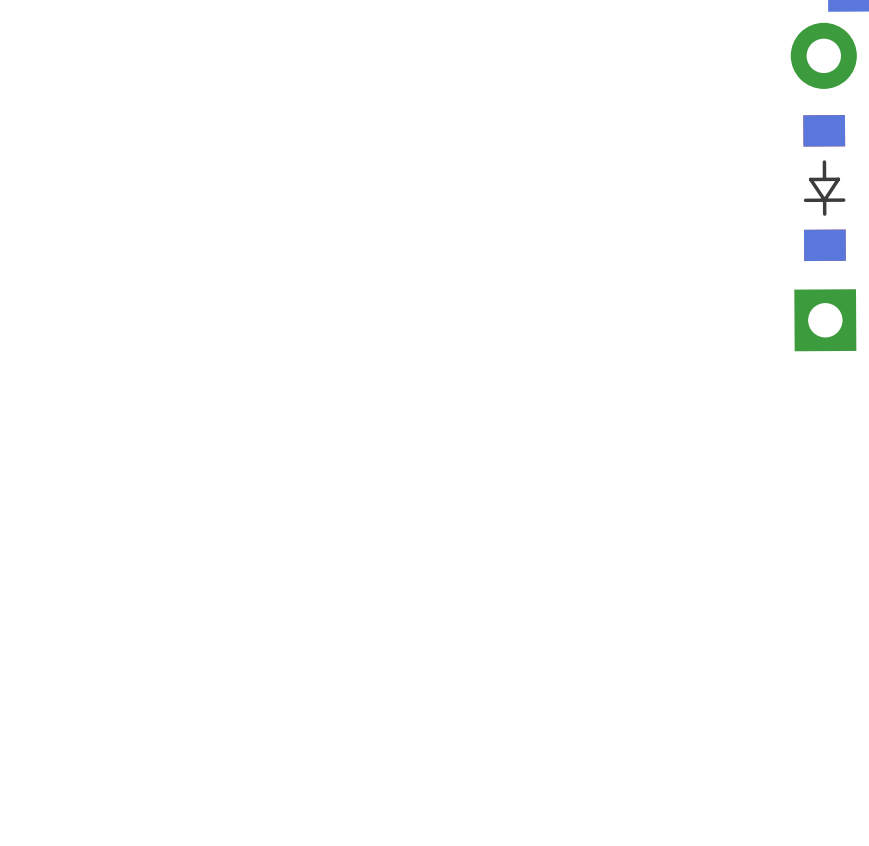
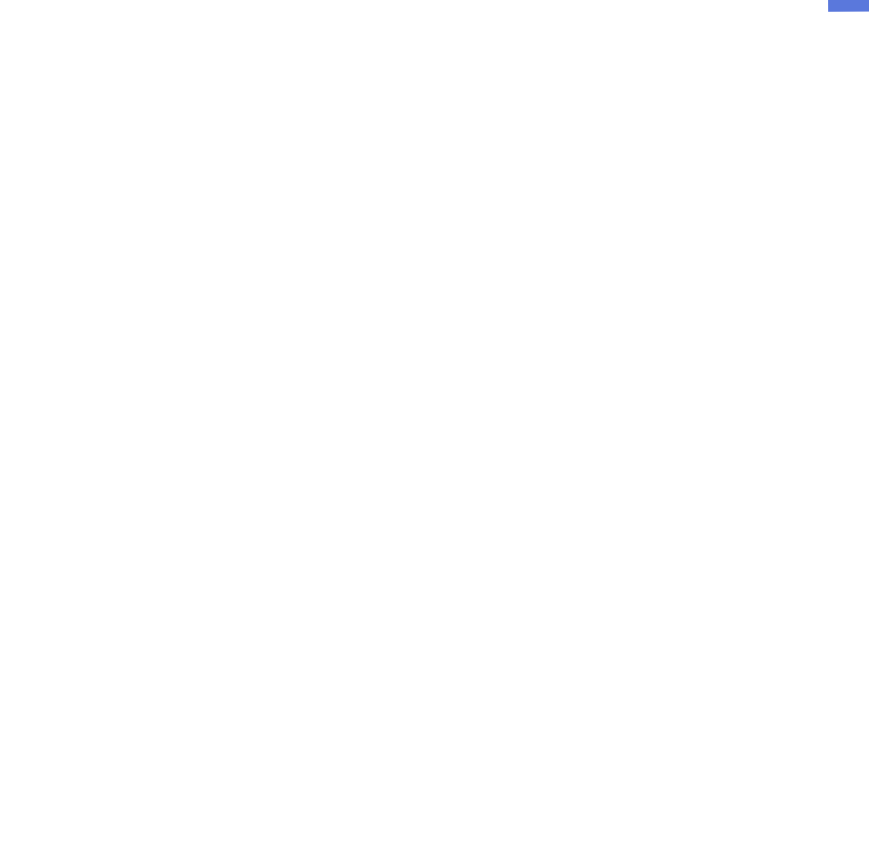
part: (823, 187) -> none

